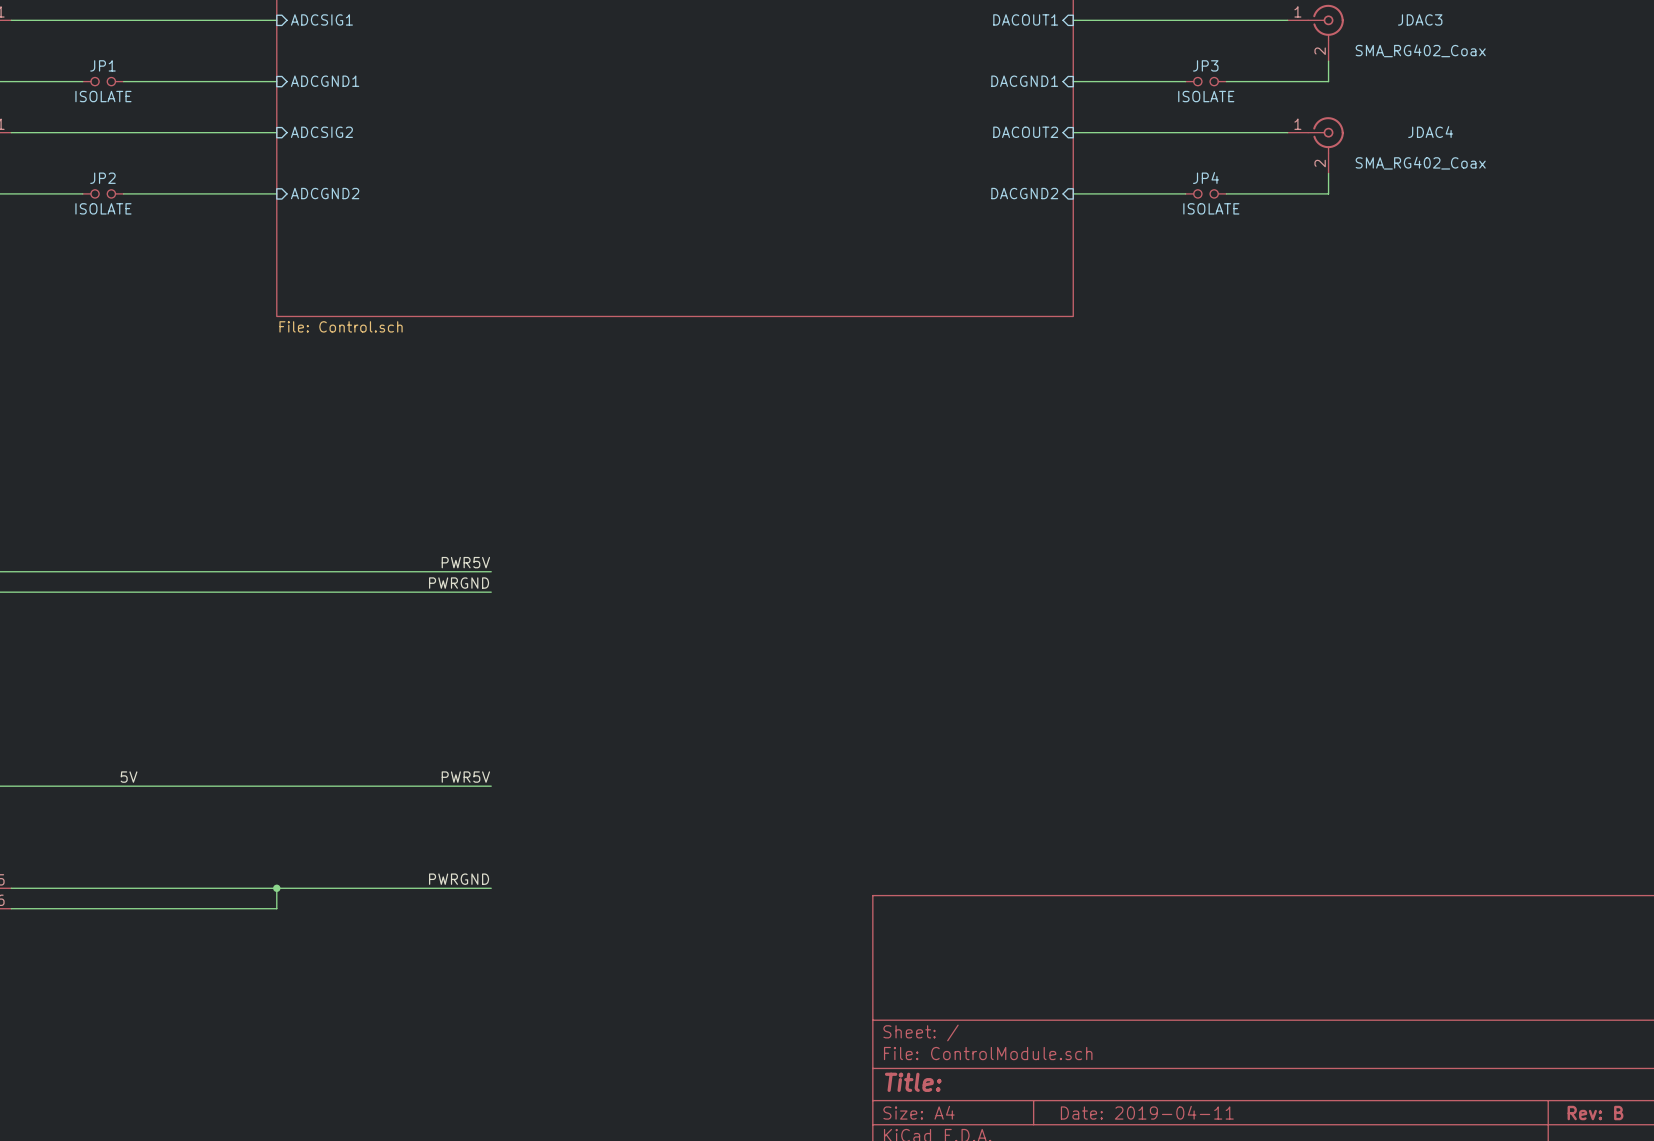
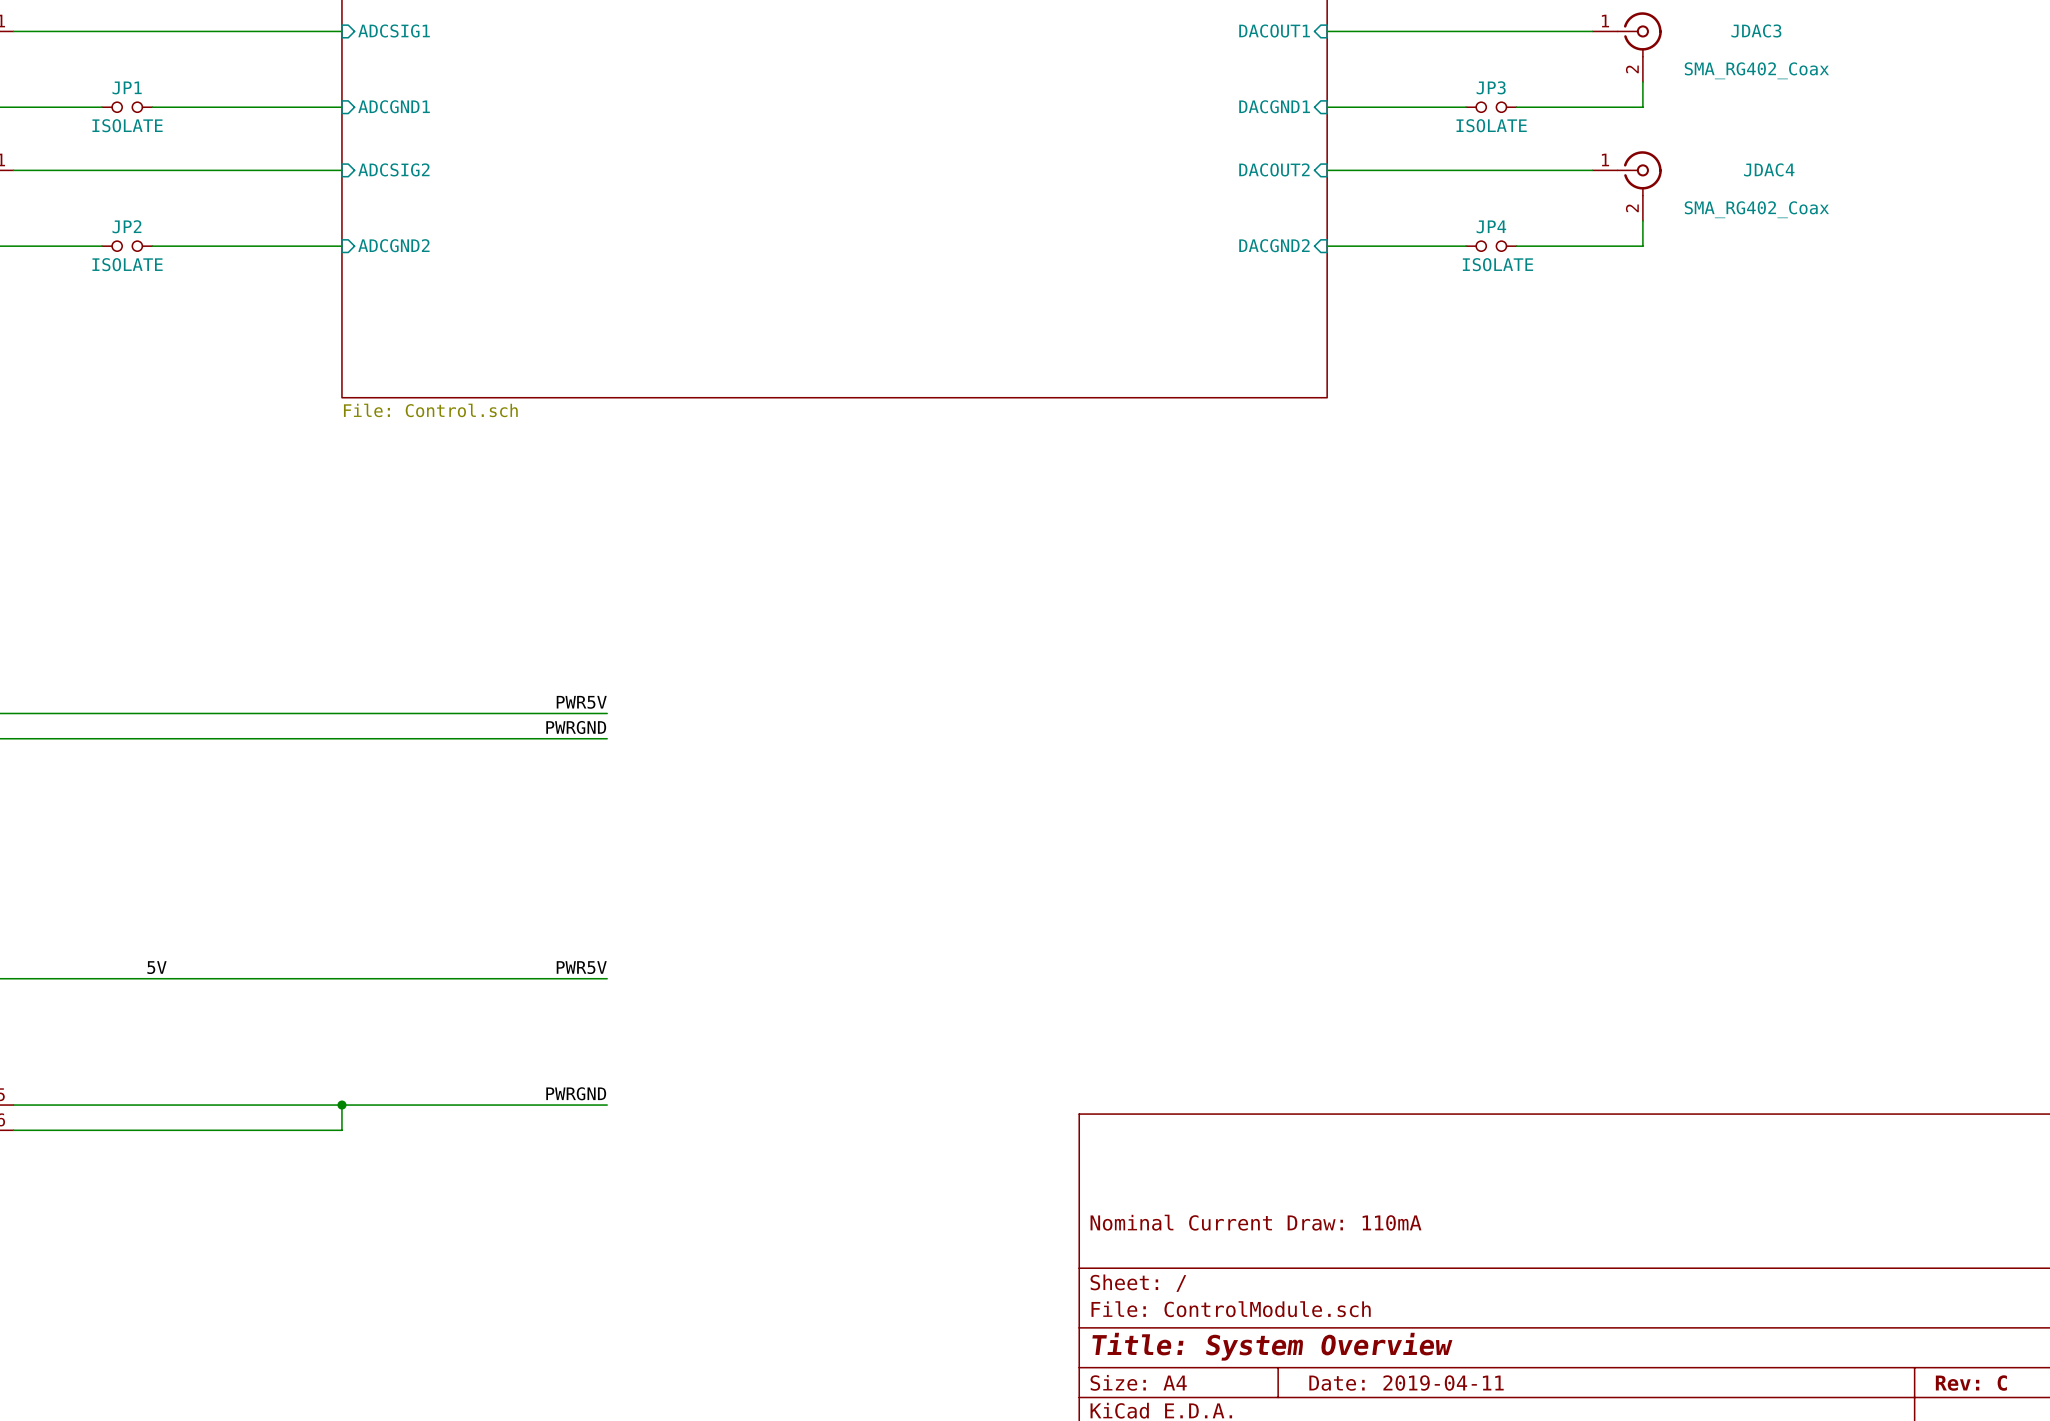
title block: none -> Nominal Current Draw: 110mA (1255, 1222)
title block: Title: (913, 1082) -> Title: System Overview (1272, 1346)
title block: Rev: B (1595, 1113) -> Rev: C (1971, 1383)

